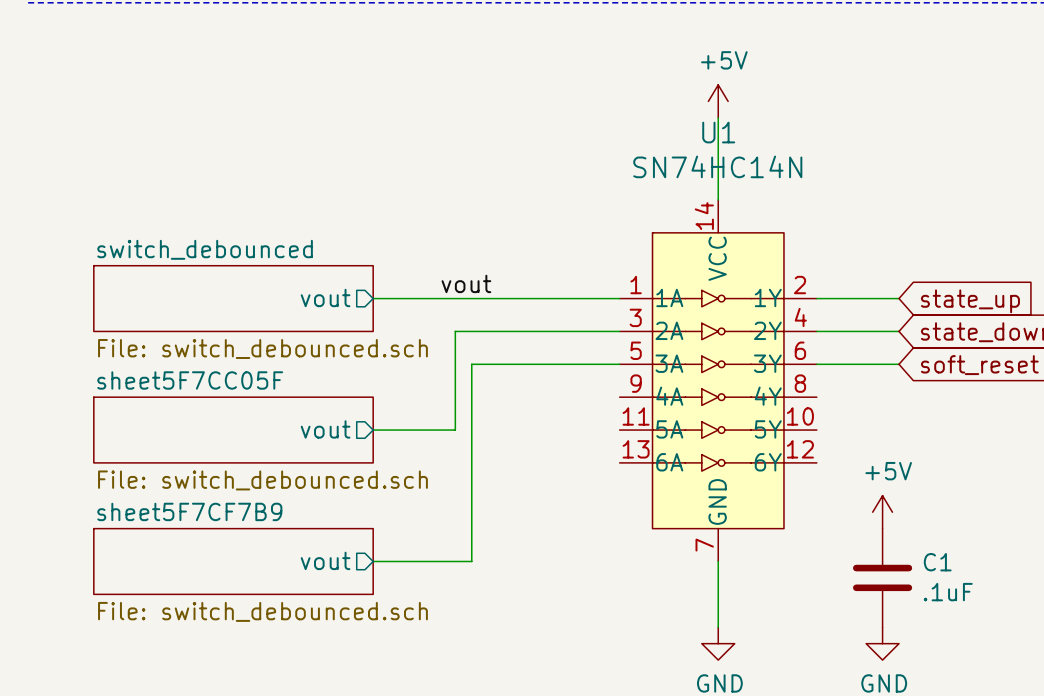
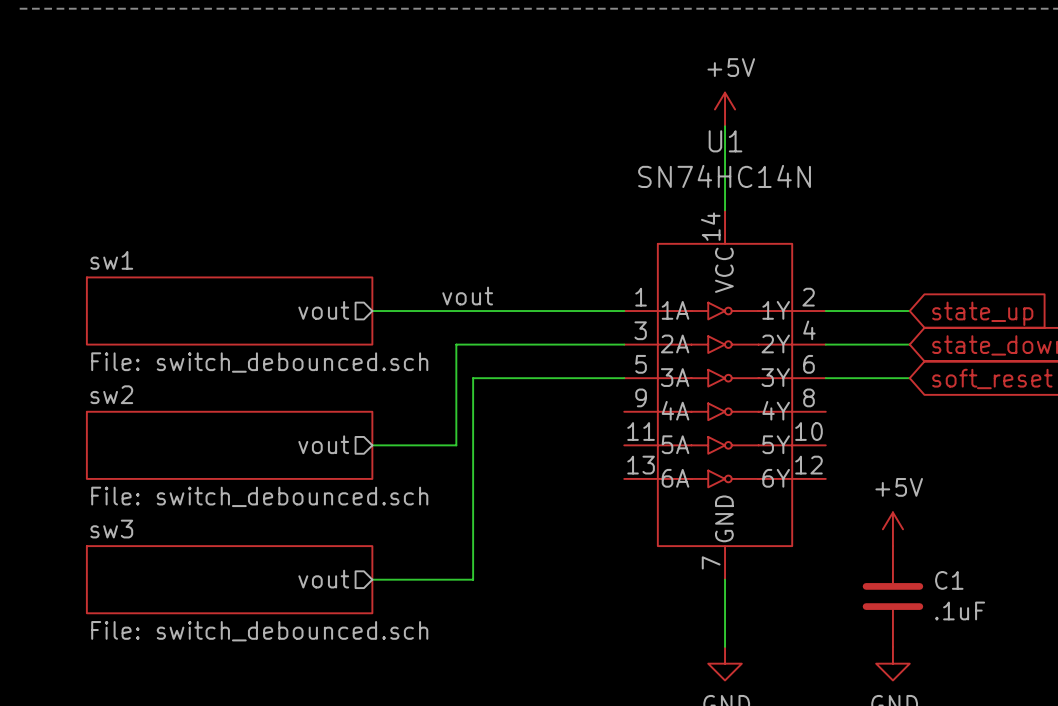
sheet switch_debounced name: switch_debounced (205, 249) -> sw1 (111, 260)
sheet sheet5F7CC05F name: sheet5F7CC05F (190, 380) -> sw2 (111, 394)
sheet sheet5F7CF7B9 name: sheet5F7CF7B9 (189, 511) -> sw3 (111, 529)

